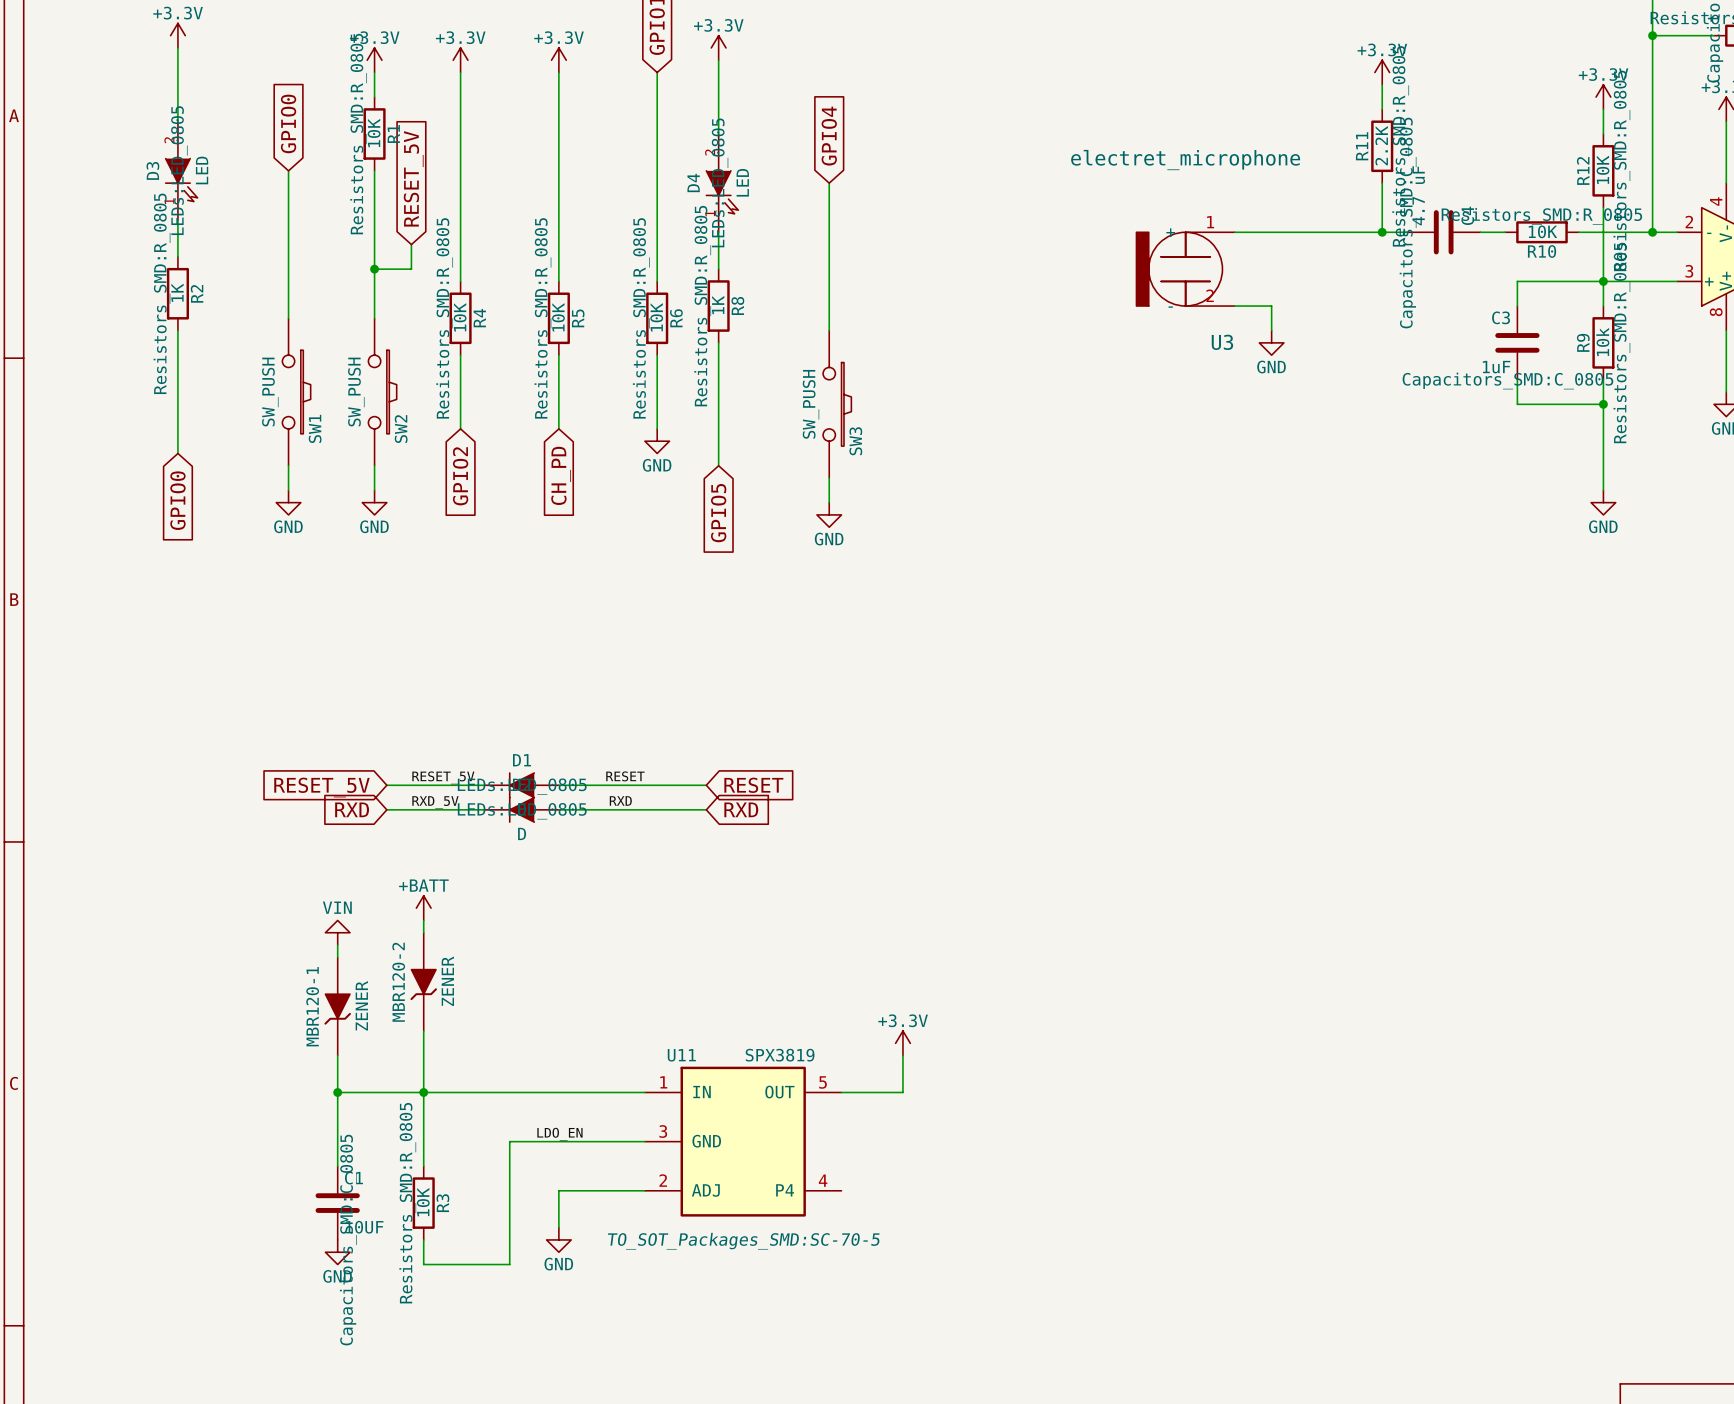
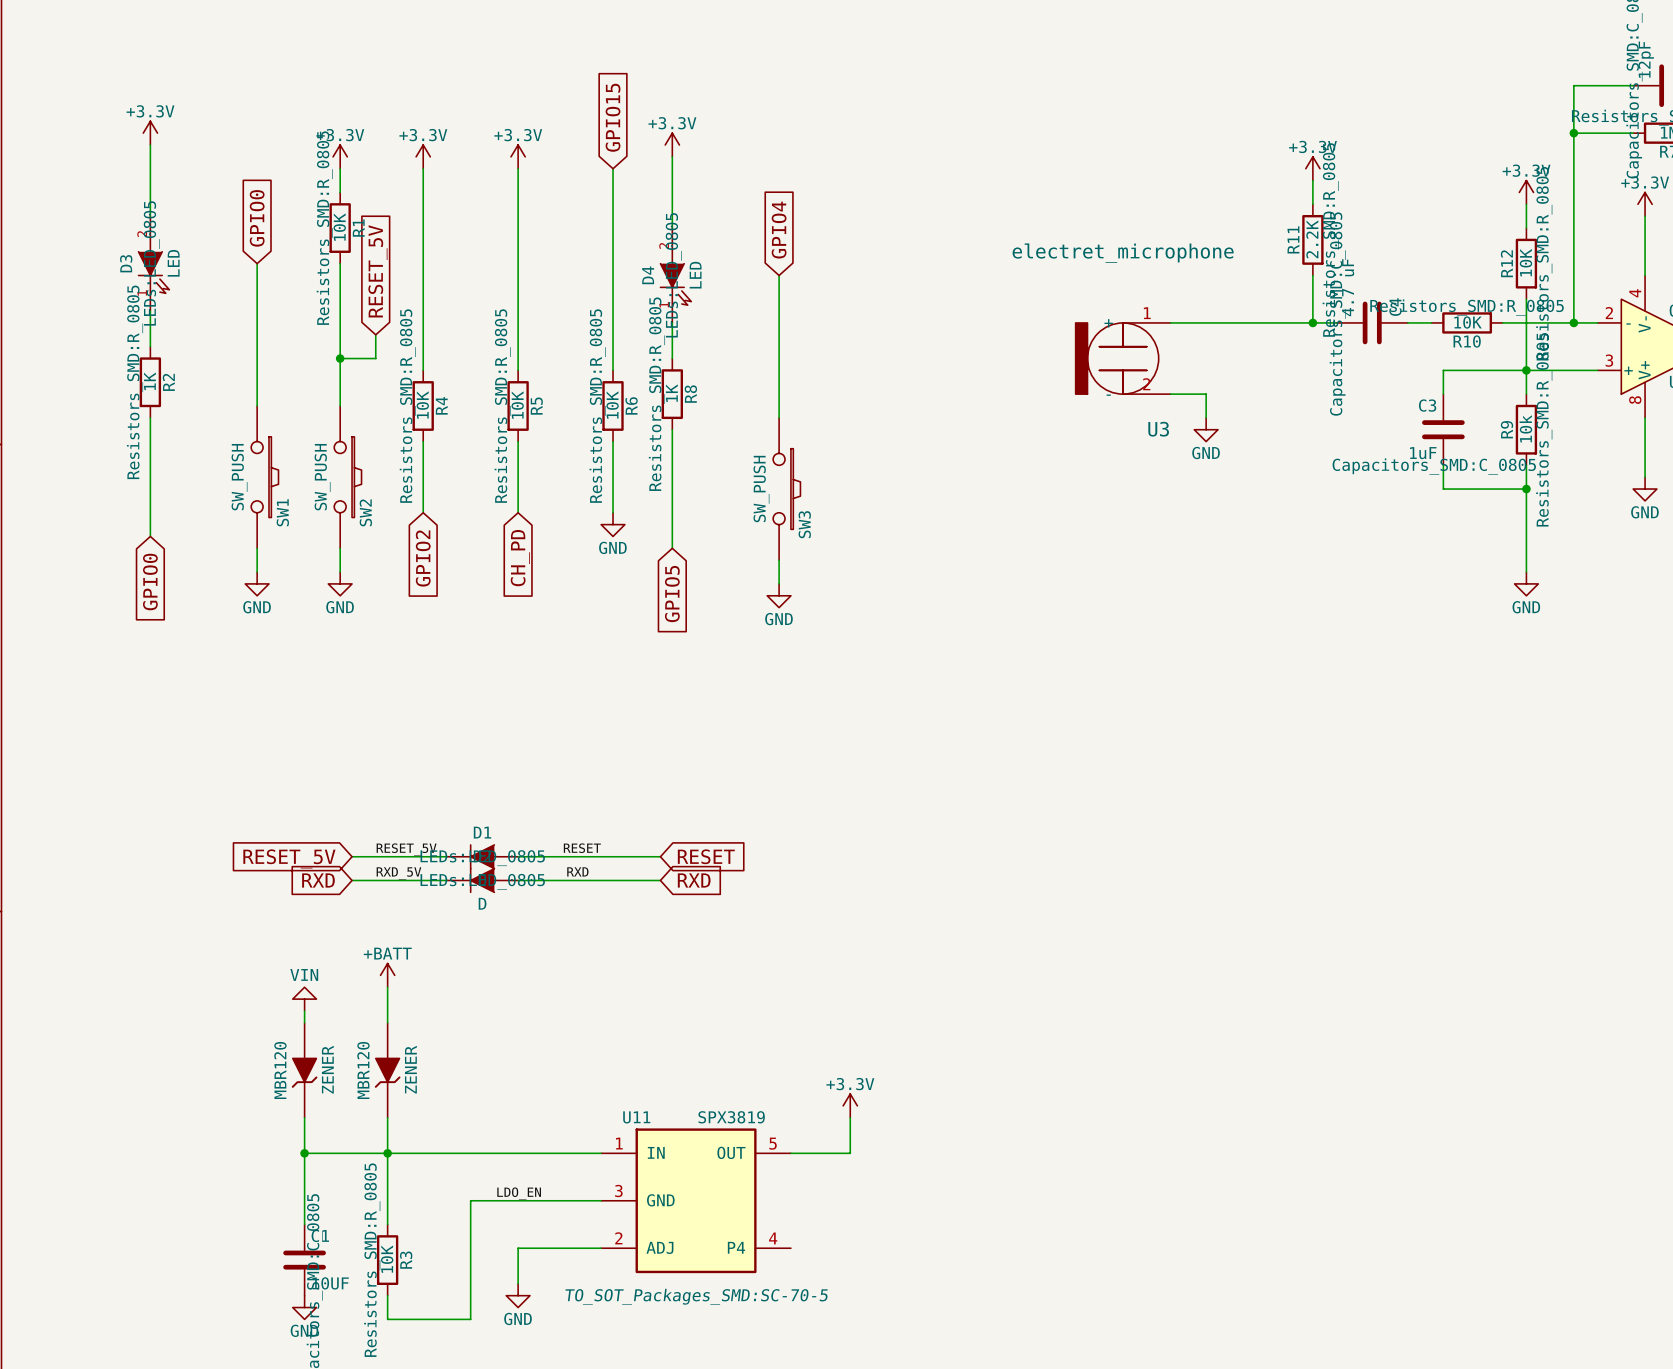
MBR120-2: ZENER (423, 981) -> none
MBR120-1 name: MBR120-1 (312, 1006) -> MBR120 (280, 1070)
MBR120: none -> ZENER (387, 1070)

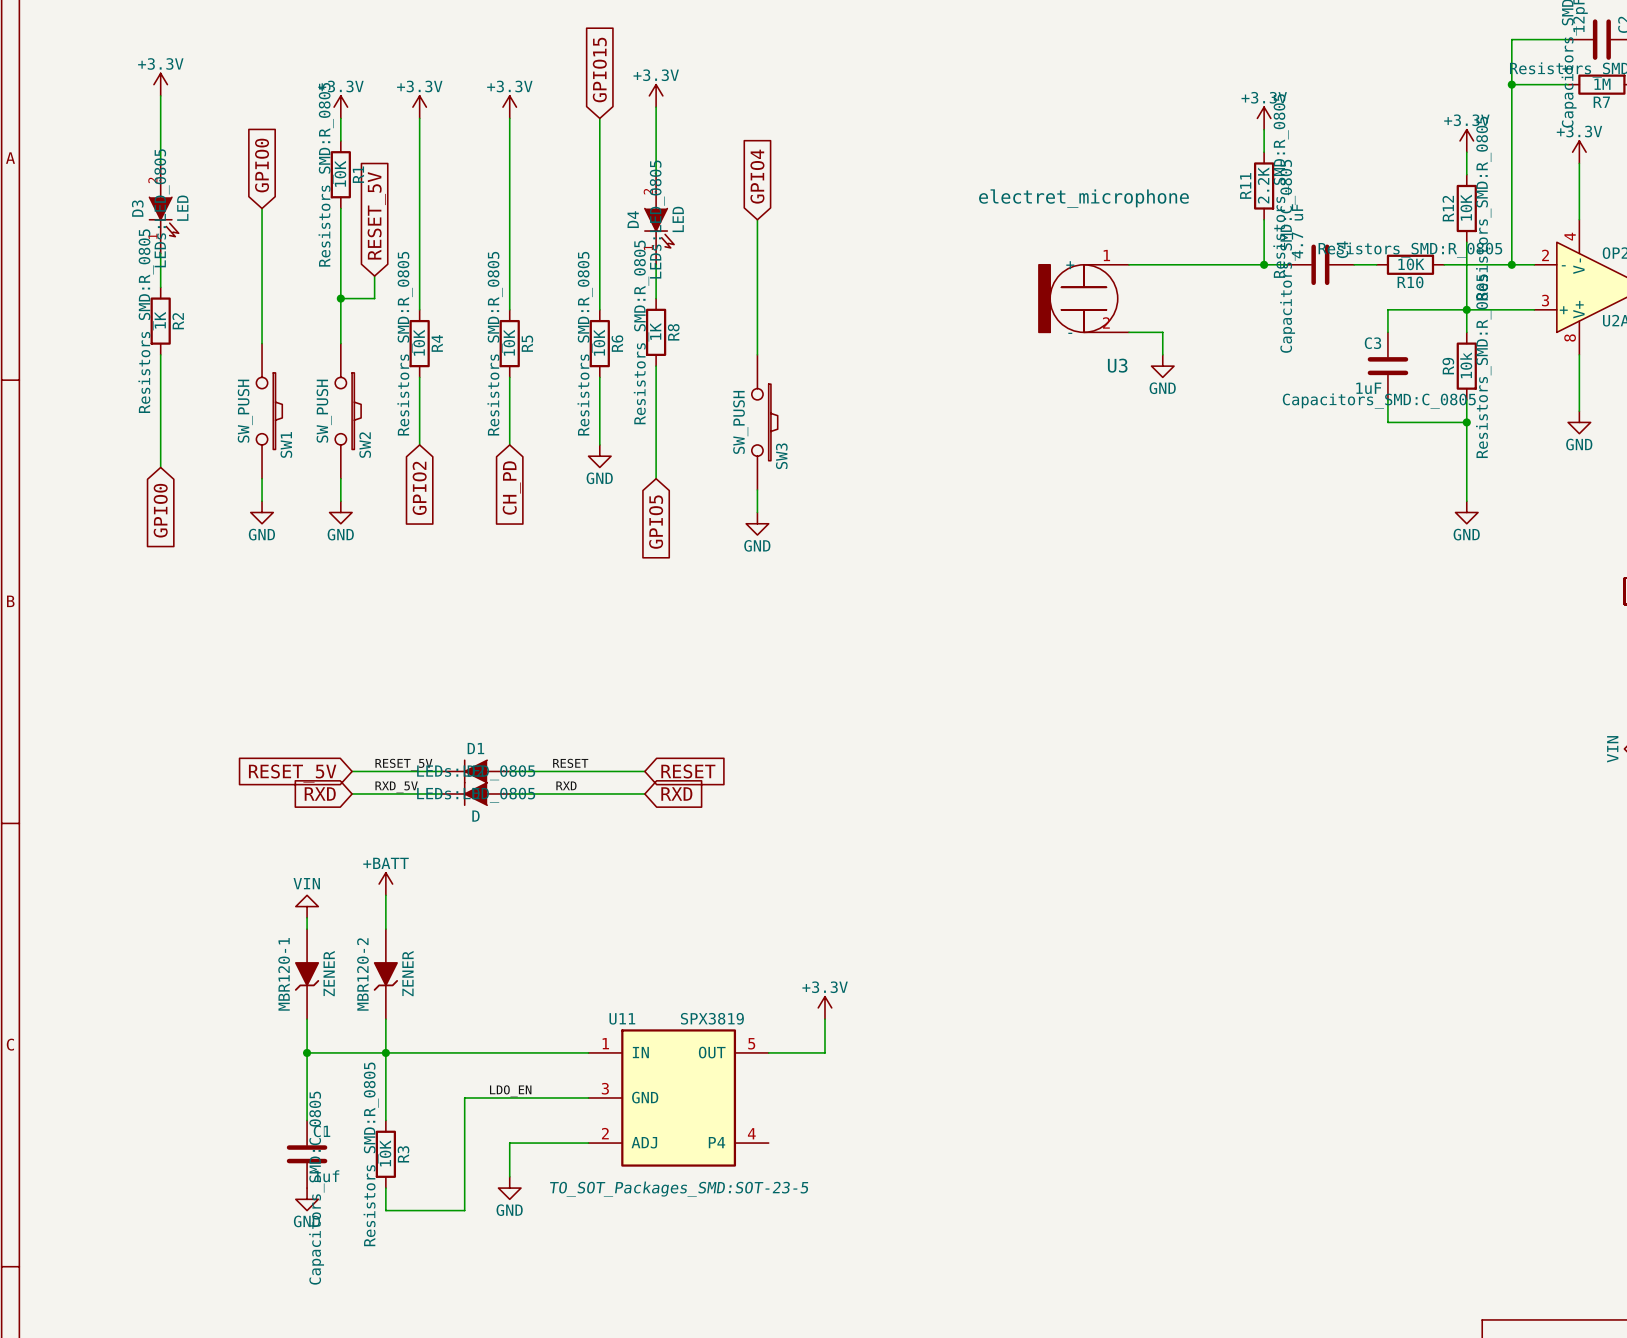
MBR120 name: MBR120 (280, 1070) -> MBR120-1 (284, 974)
MBR120 name: MBR120 (363, 1070) -> MBR120-2 (362, 974)
C1 value: 10UF (330, 1283) -> 1uf (326, 1176)
U11 text: TO_SOT_Packages_SMD:SC-70-5 (696, 1296) -> TO_SOT_Packages_SMD:SOT-23-5 (679, 1189)

